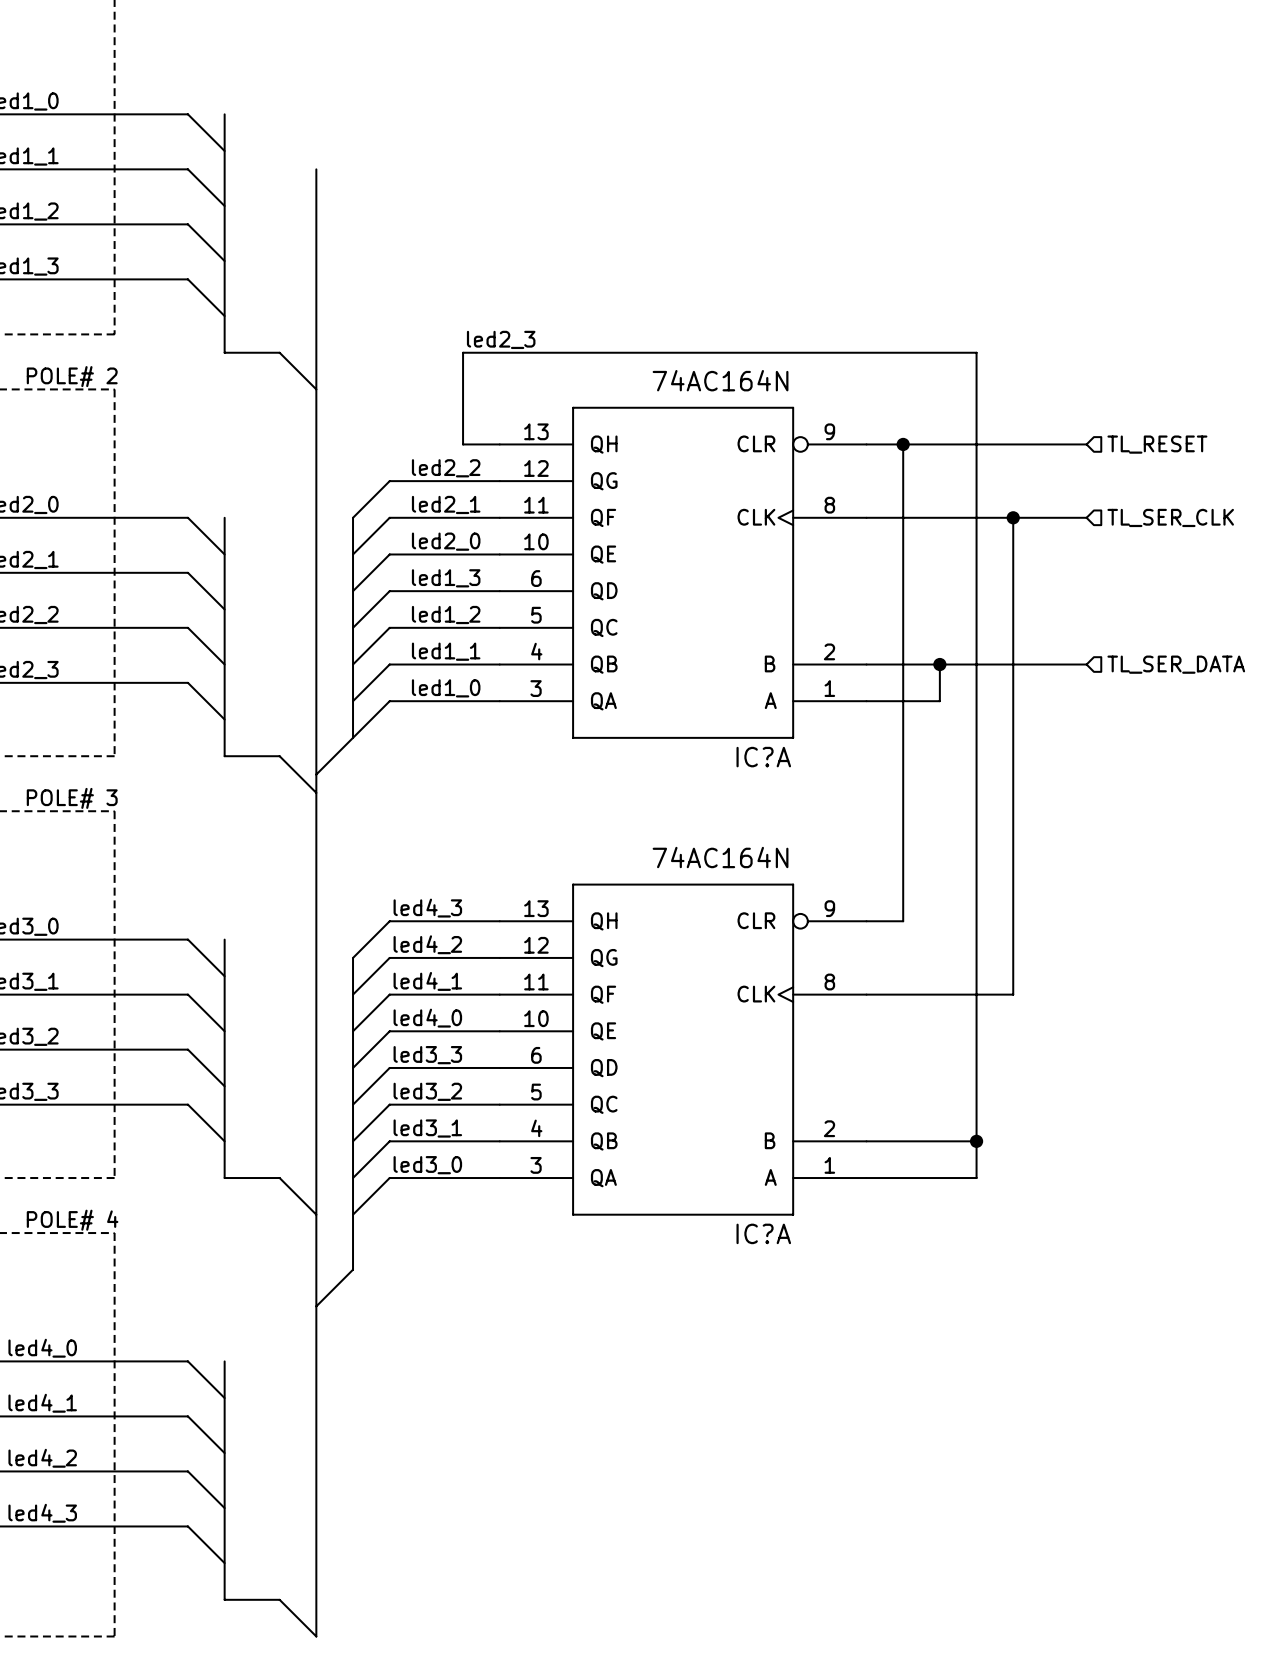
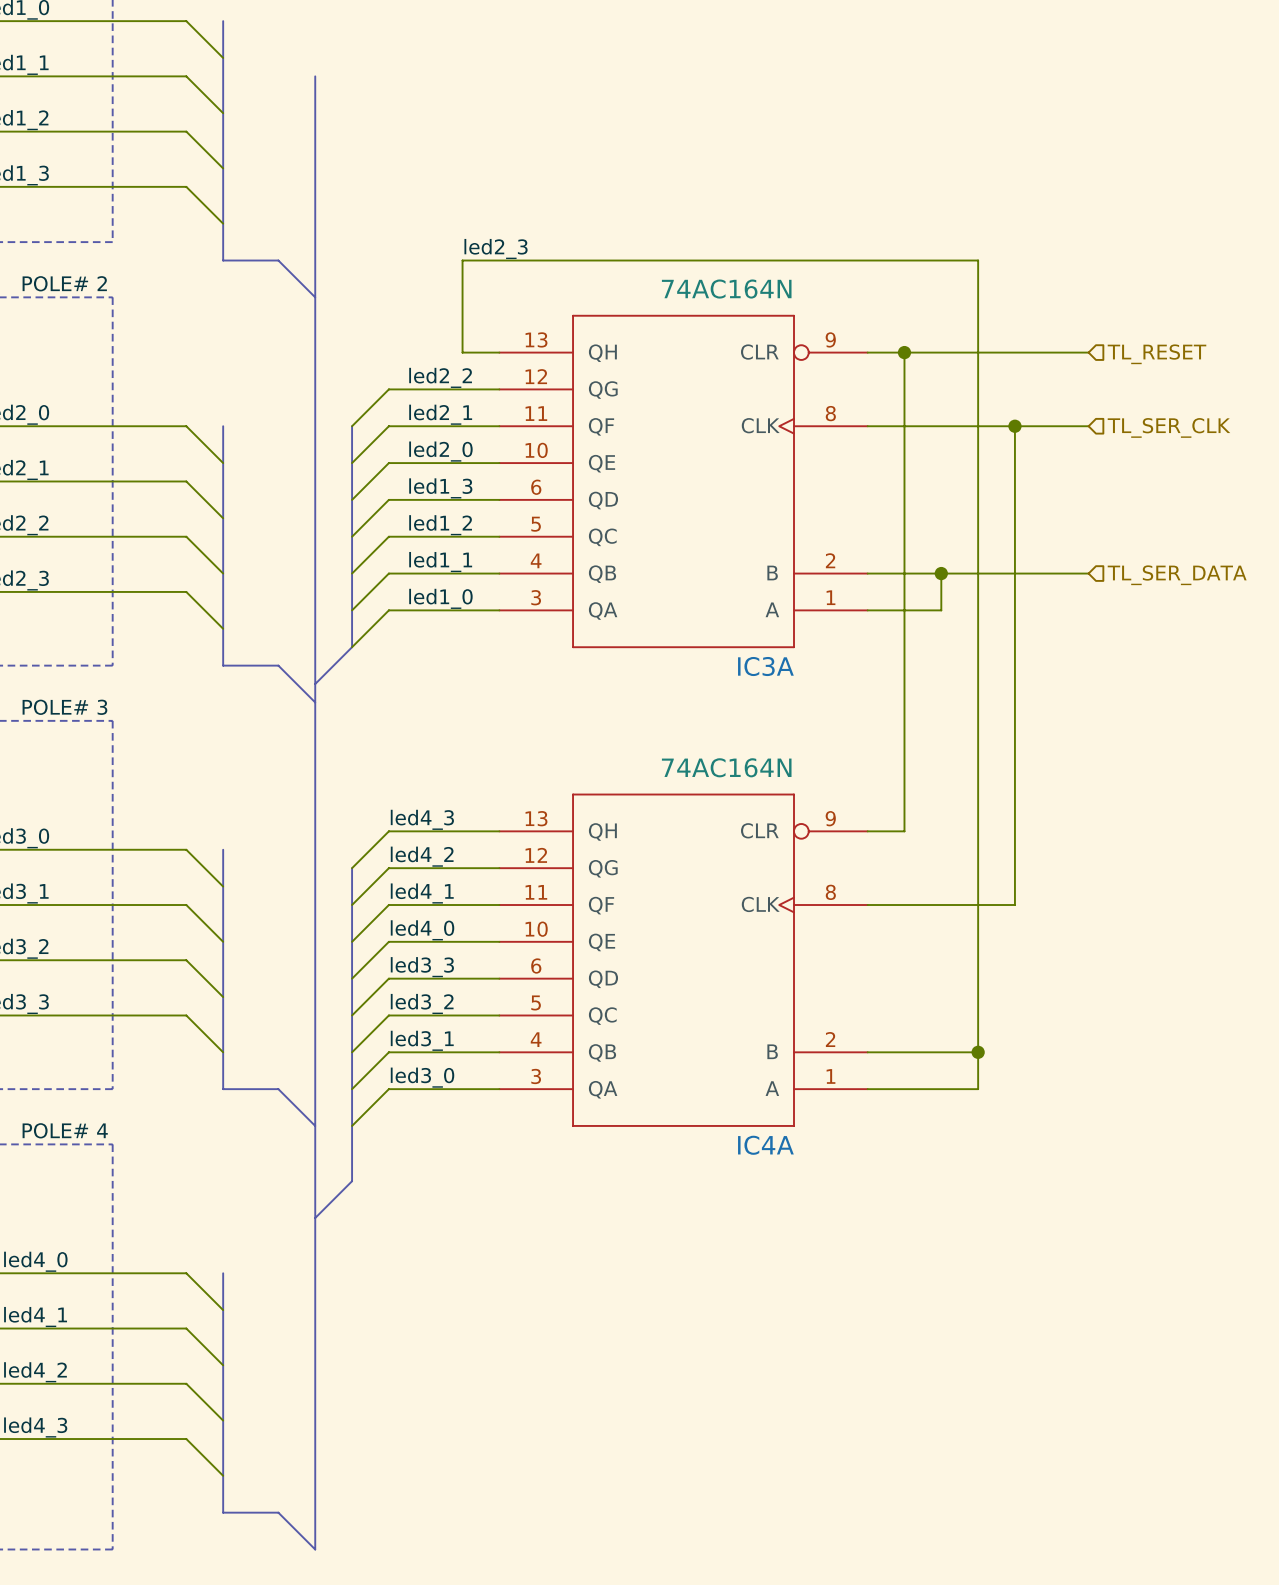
IC?A name: IC?A (763, 757) -> IC3A (765, 666)
IC?A name: IC?A (763, 1233) -> IC4A (765, 1145)

